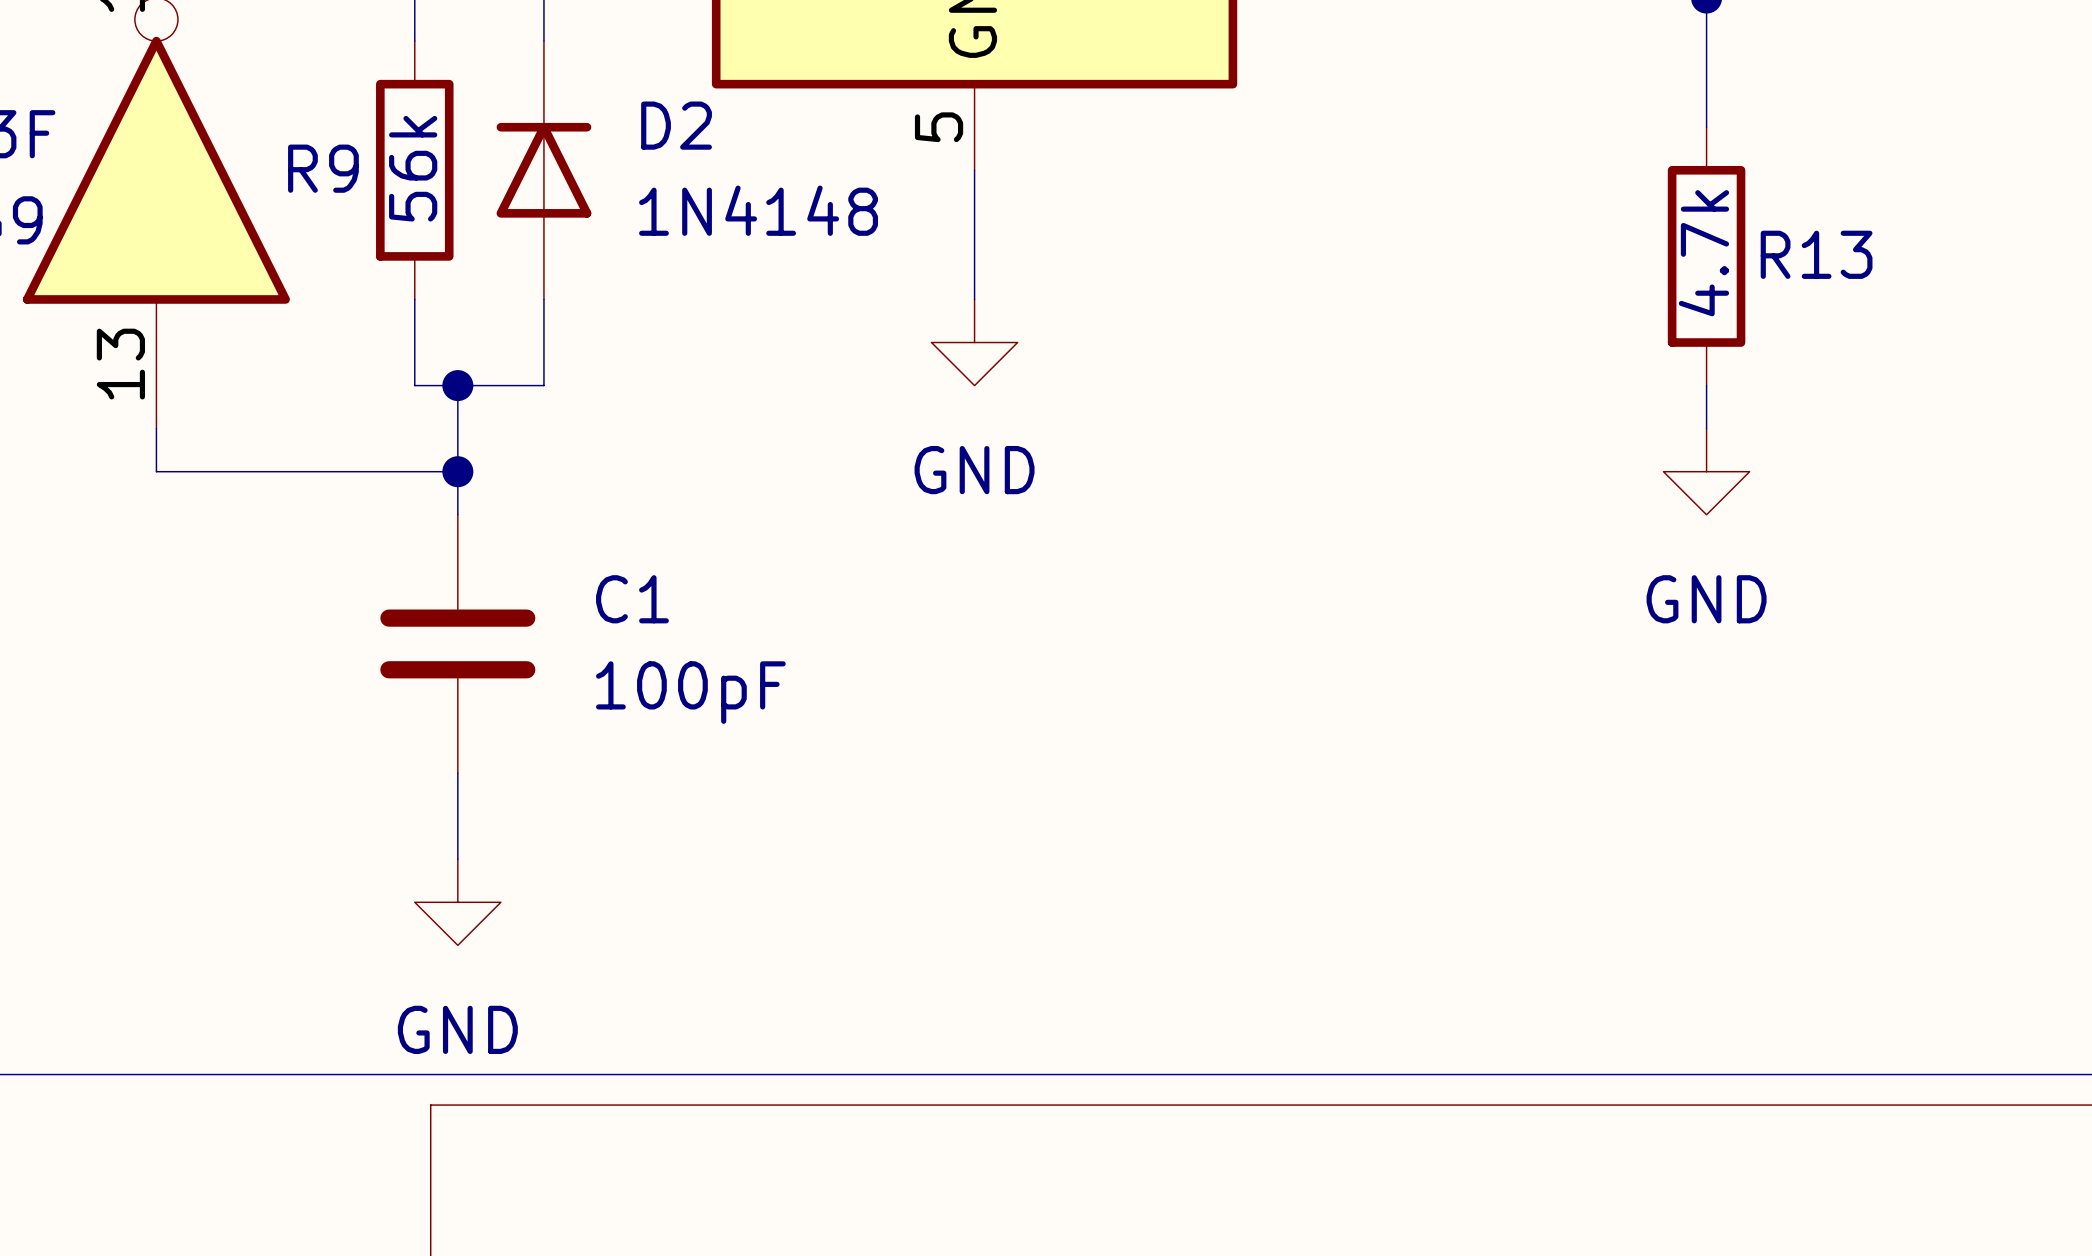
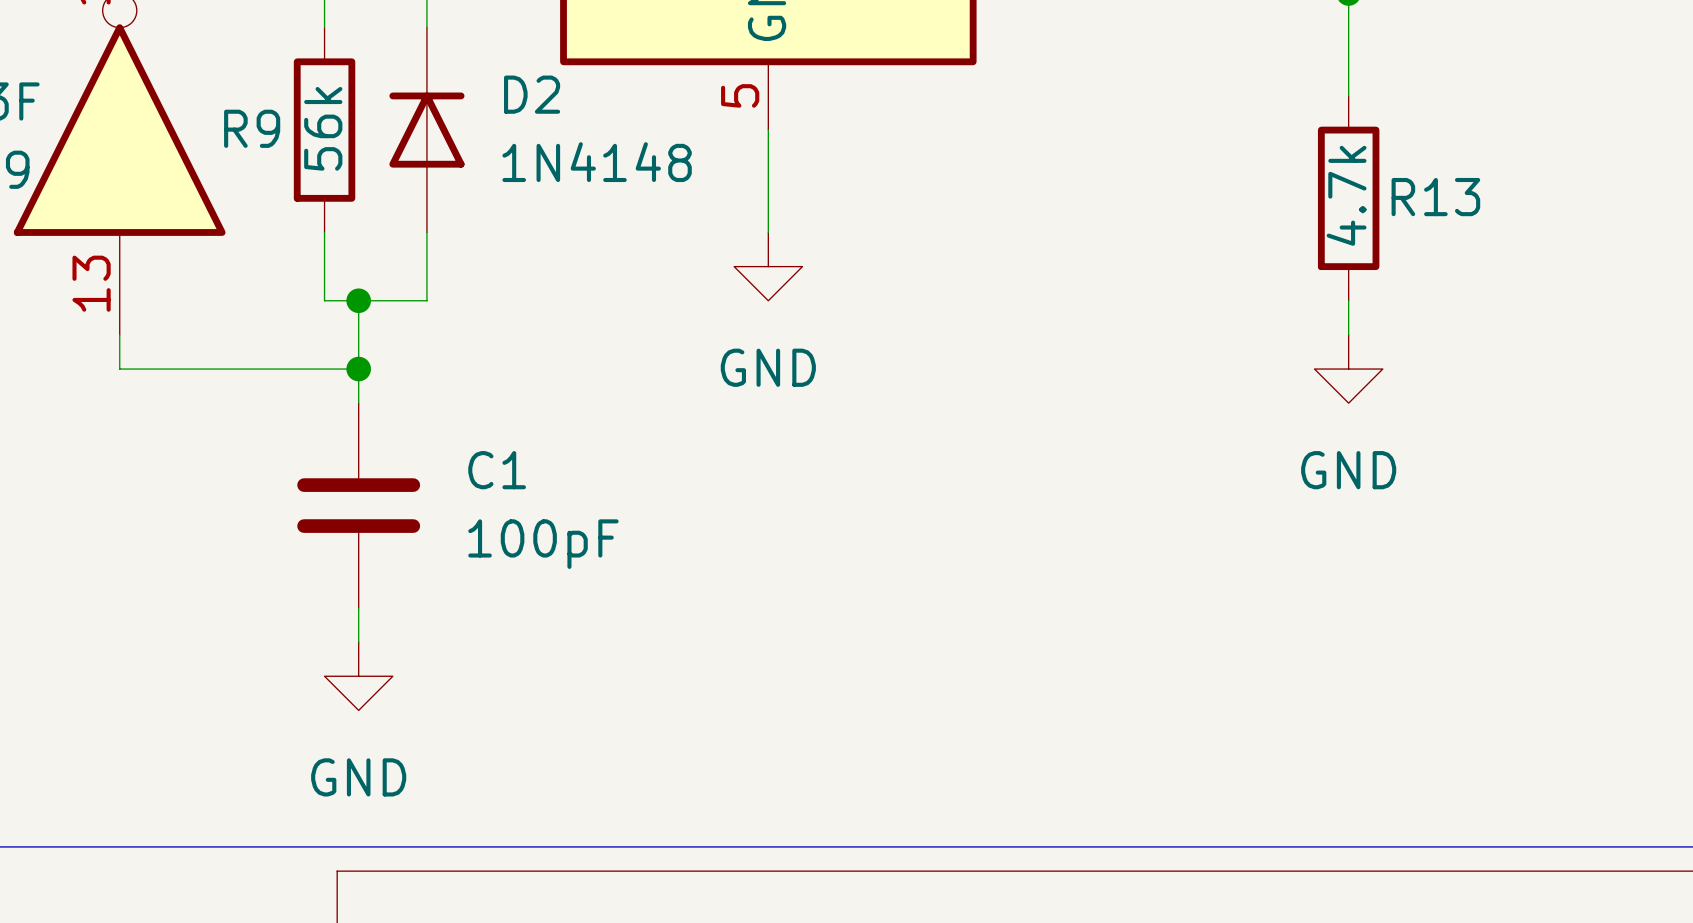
power symbol position: GND (457, 902) -> GND (358, 676)

